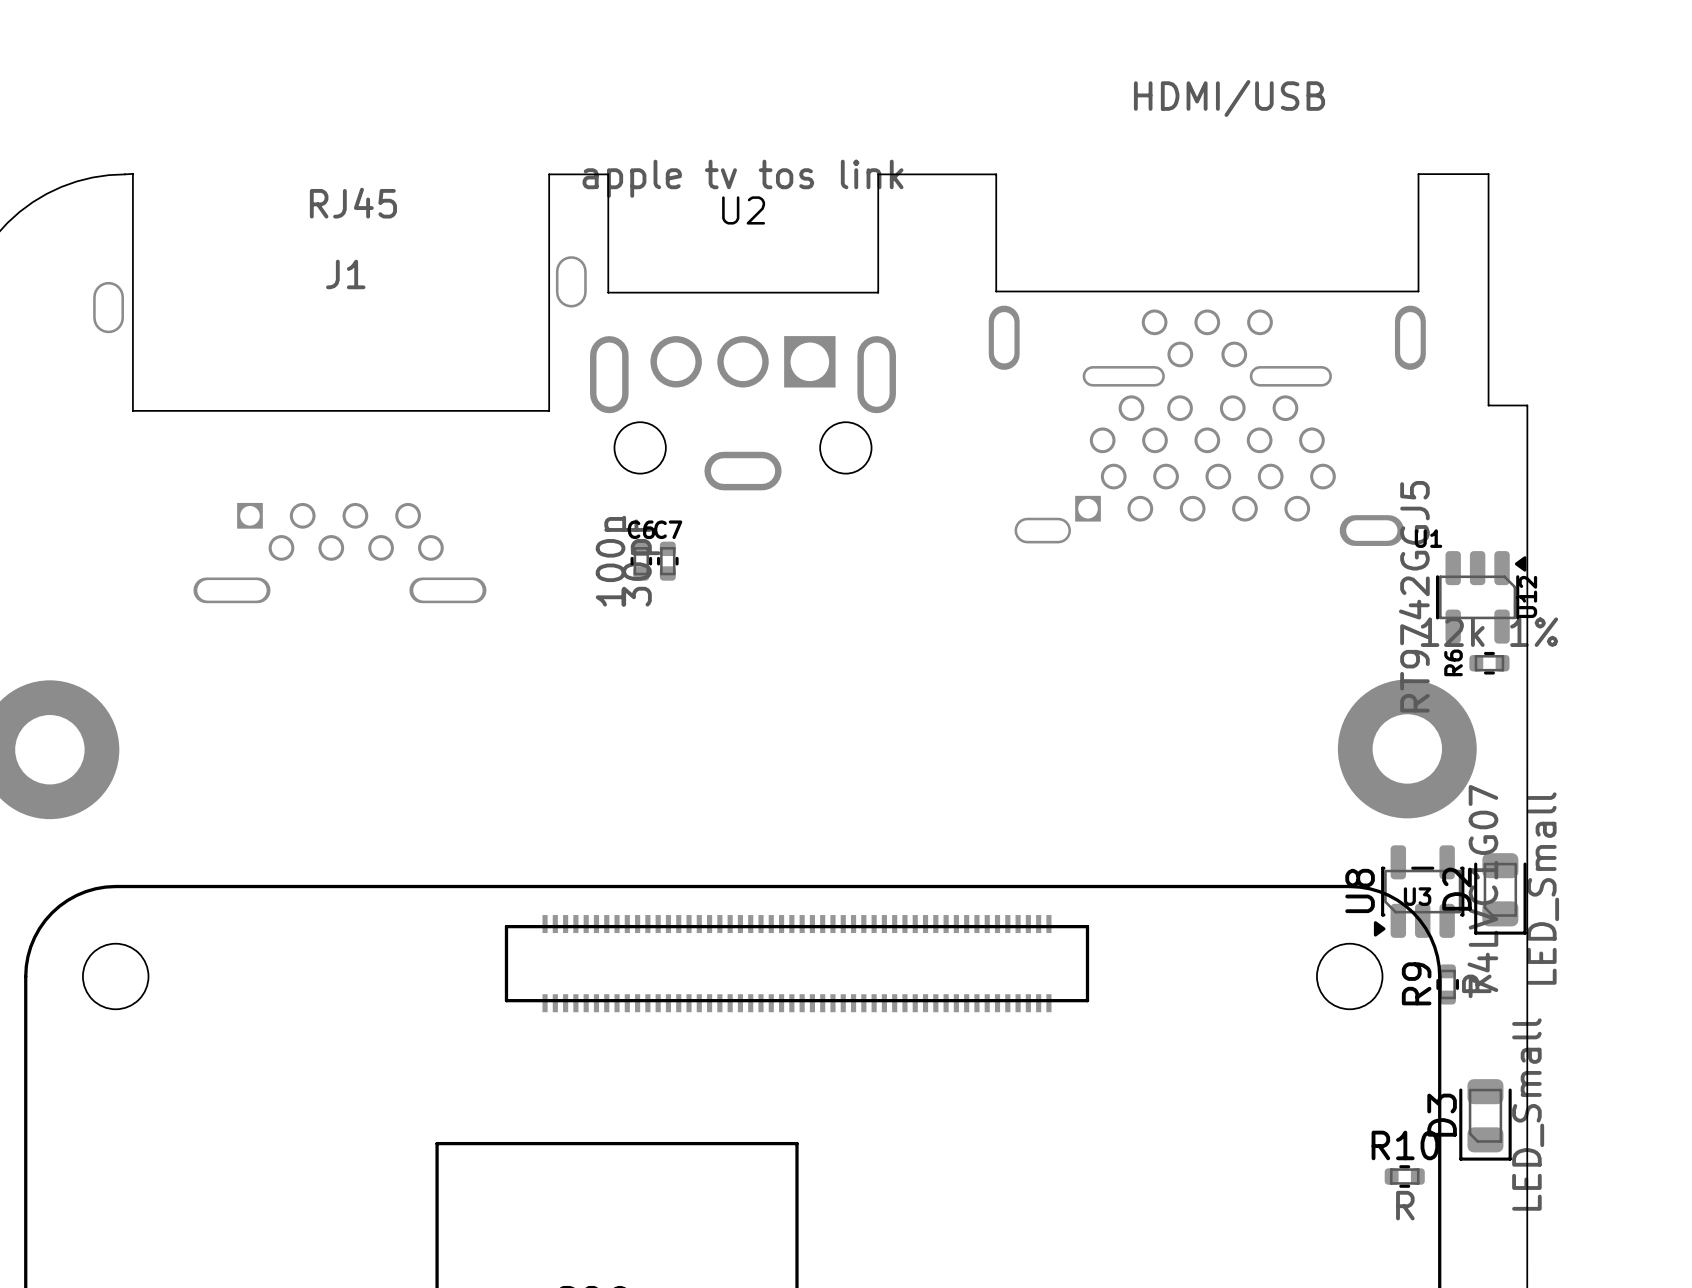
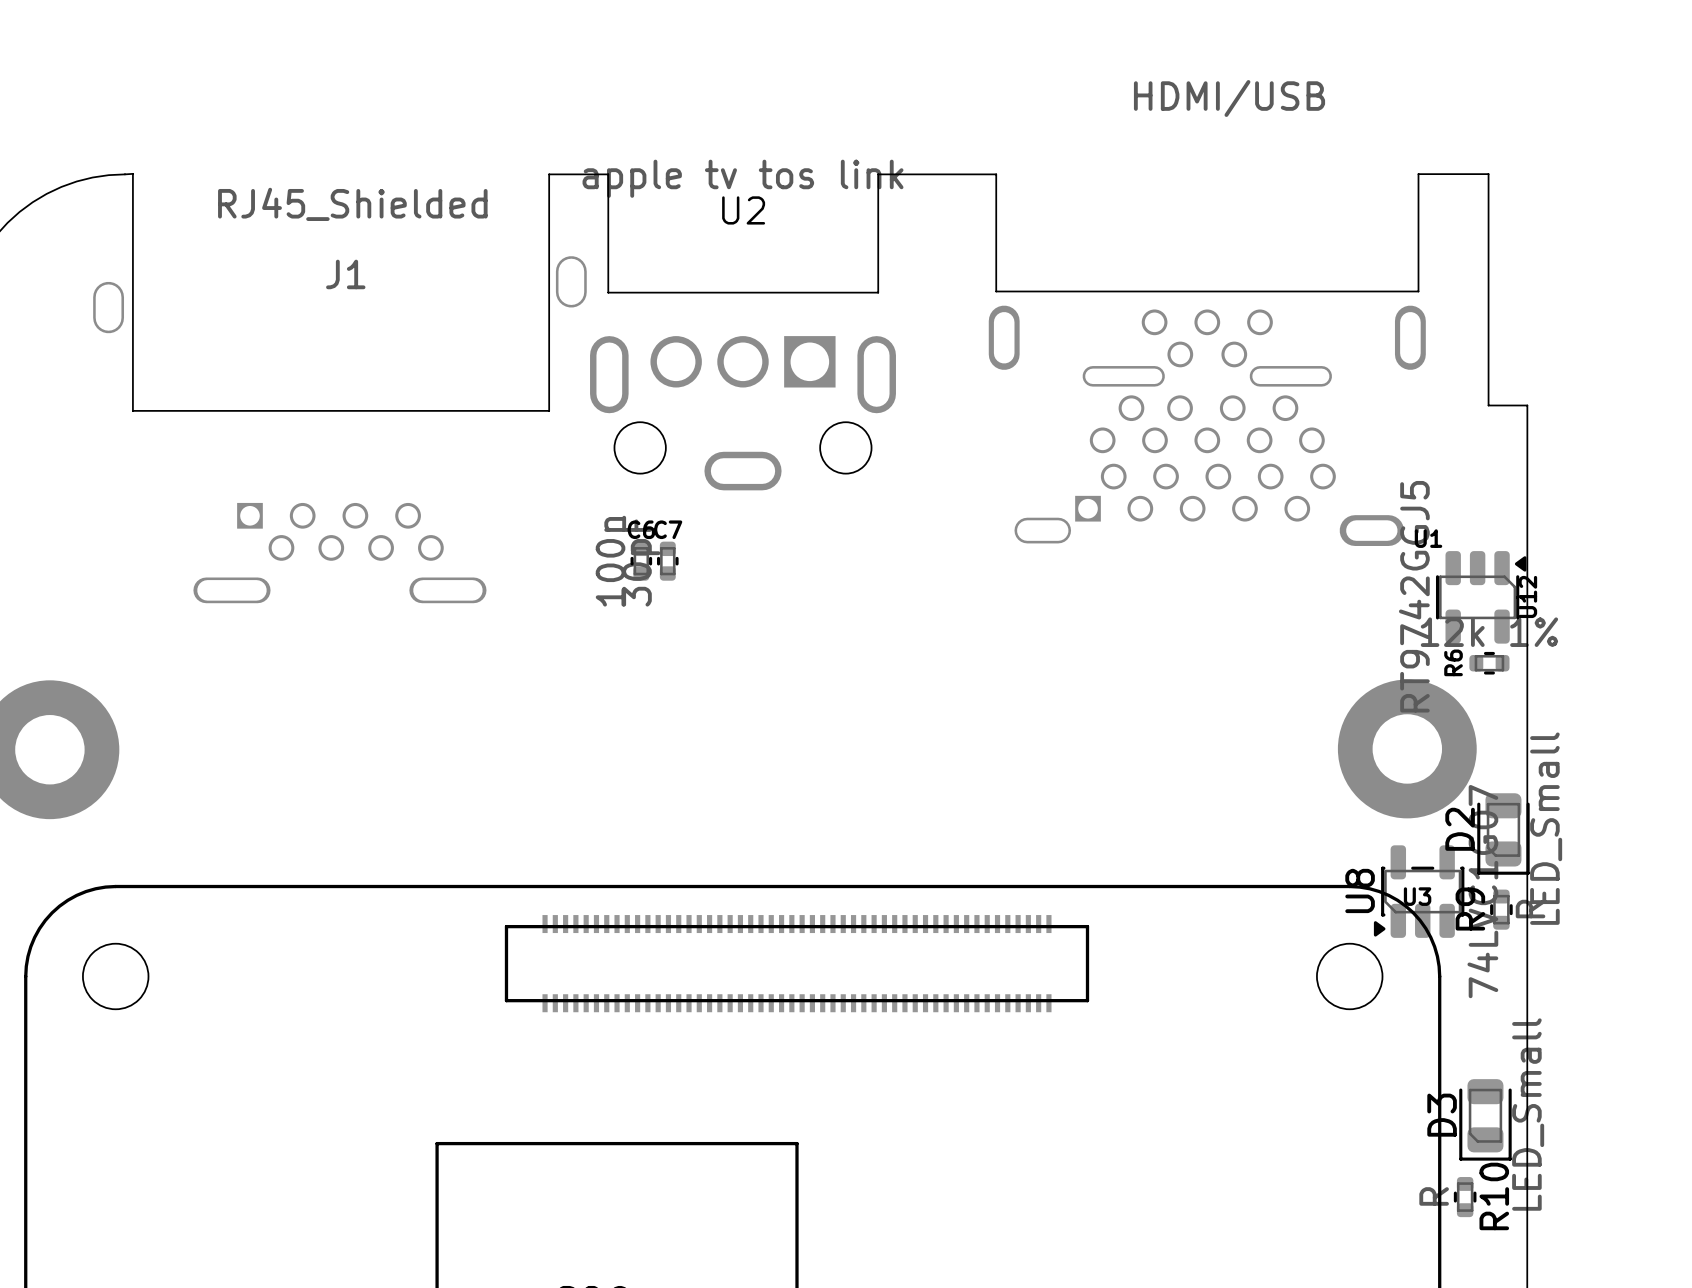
J1 value: RJ45 (353, 203) -> RJ45_Shielded (352, 204)
D2 position: (1500, 893) -> (1503, 834)
R9 position: (1447, 984) -> (1501, 909)
R10 rotation: 0° (1404, 1176) -> 90° clockwise (1465, 1197)
R10 position: (1404, 1176) -> (1465, 1197)

